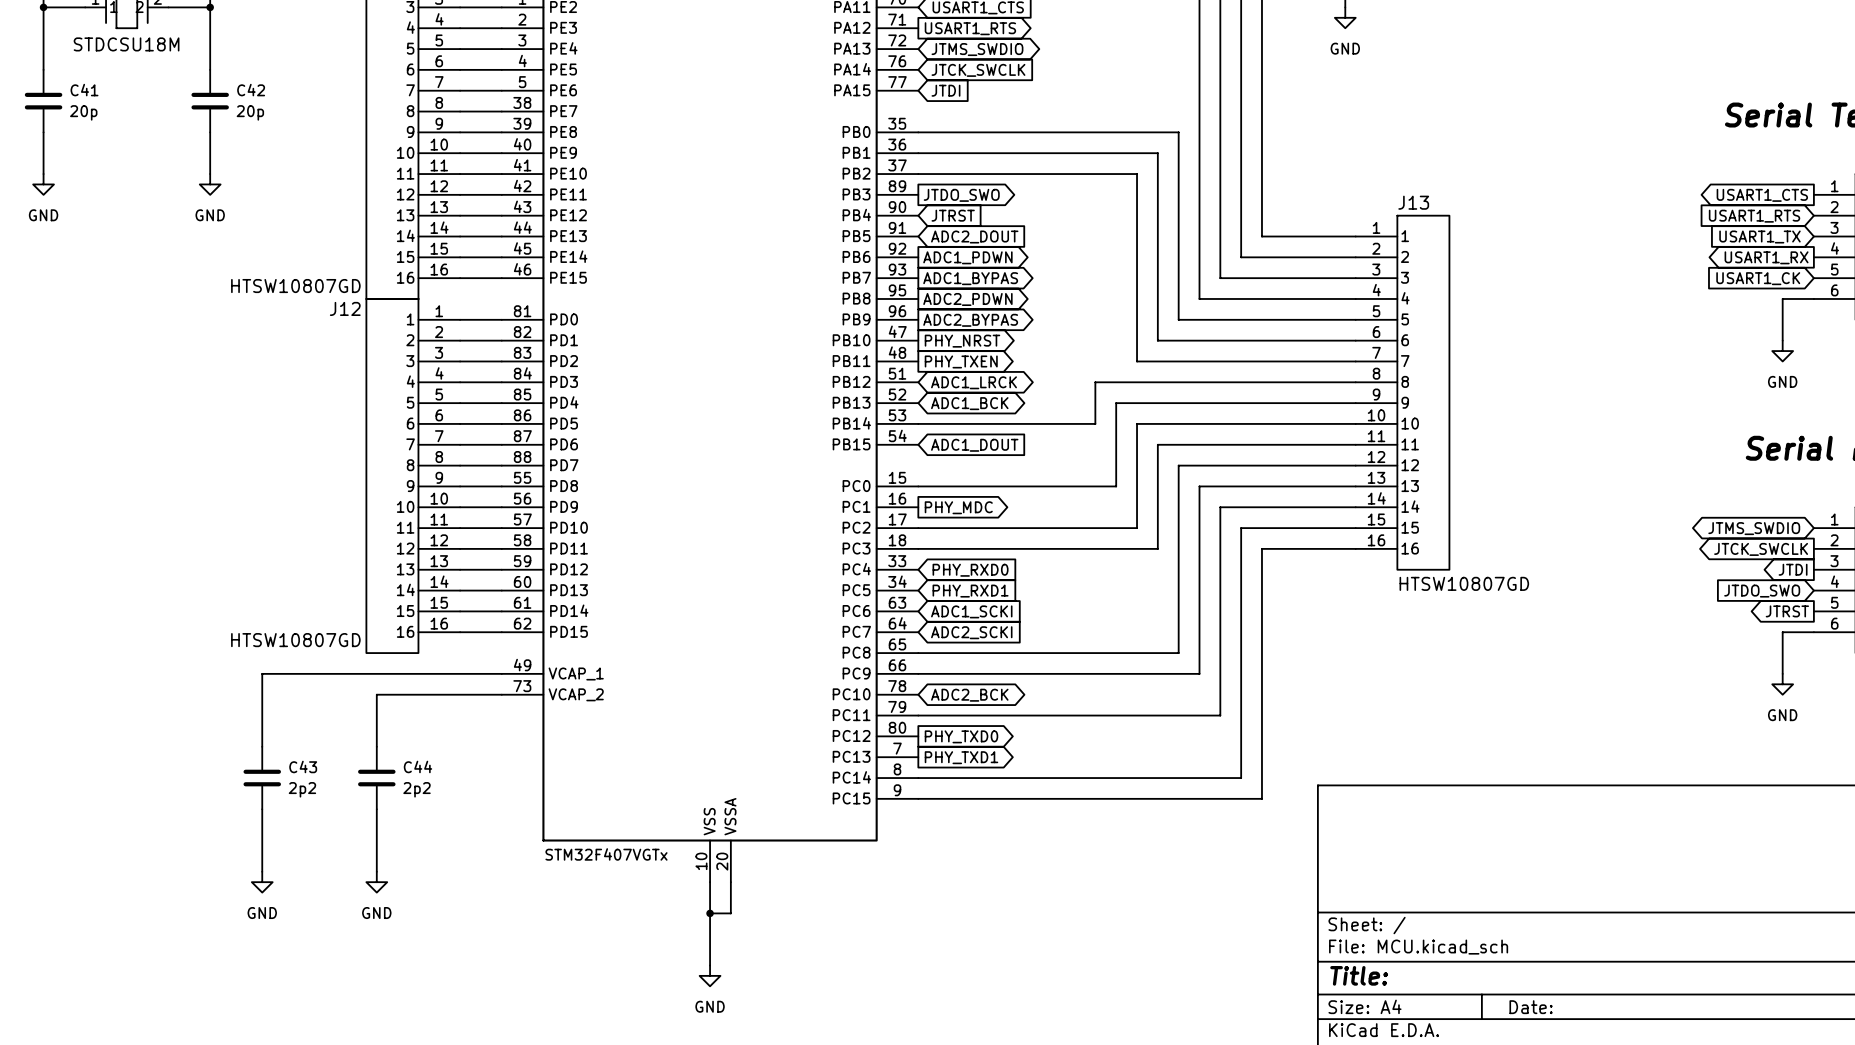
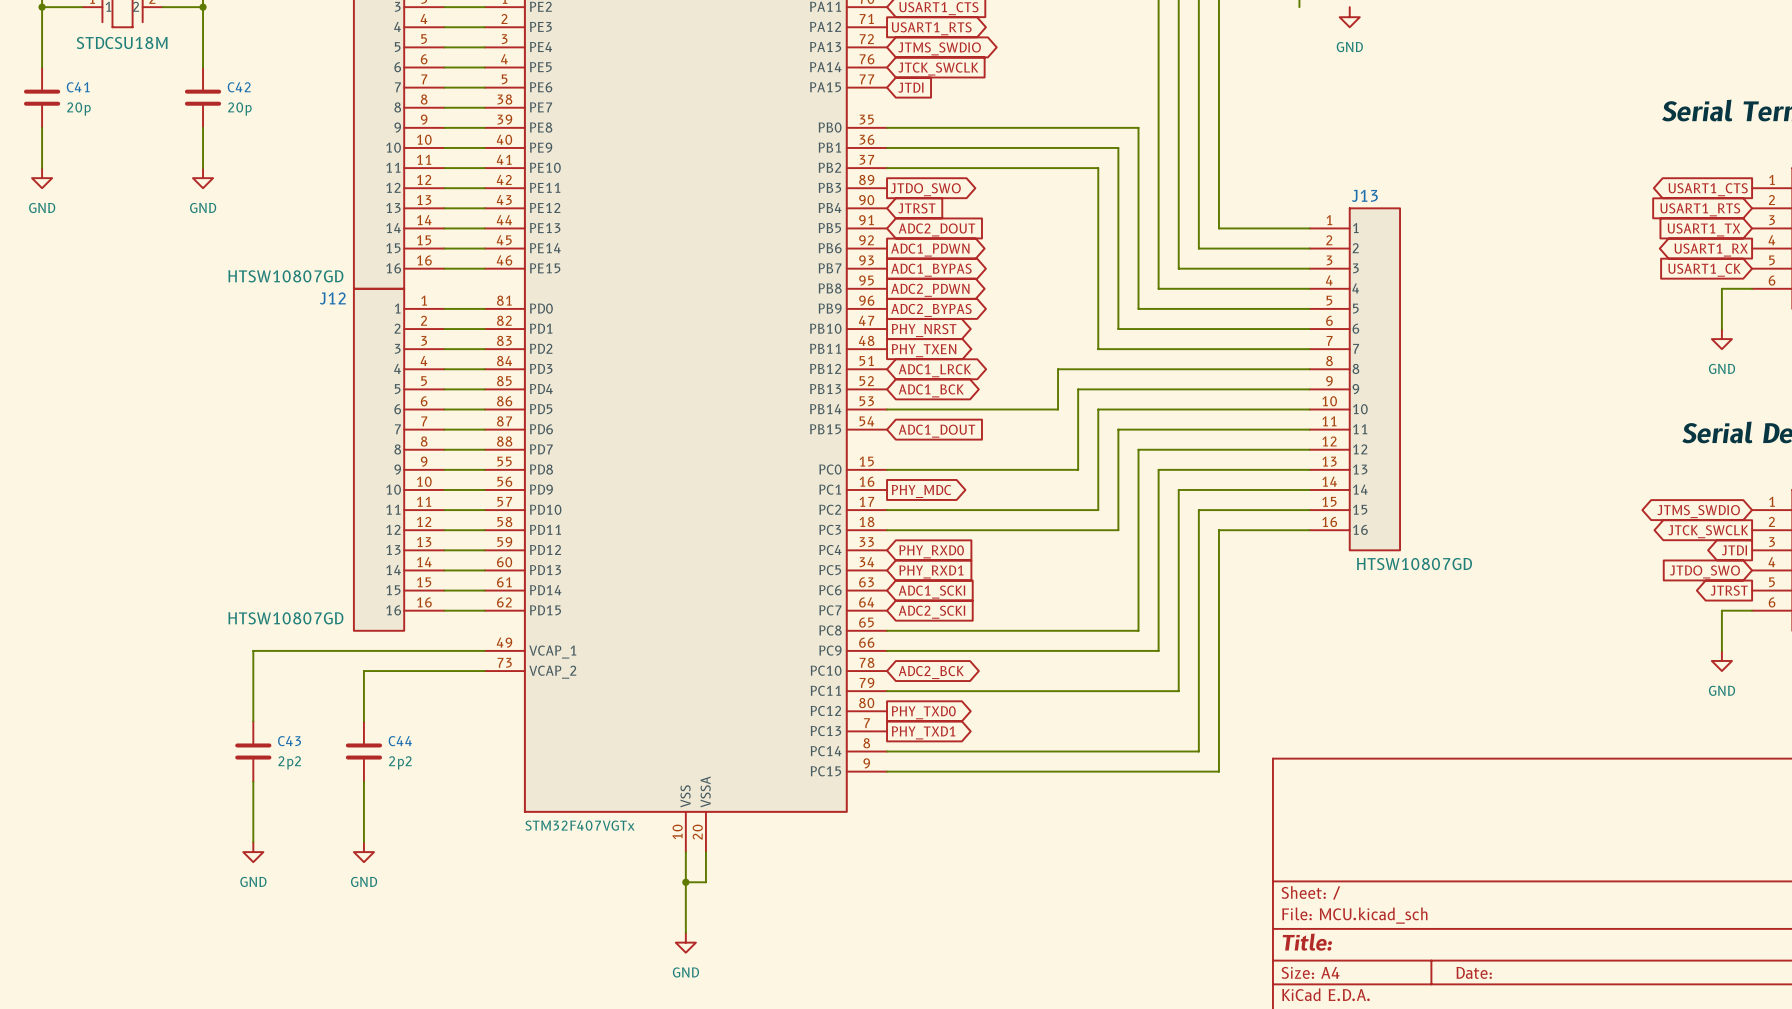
power symbol position: GND (1345, 17) -> GND (1349, 17)

